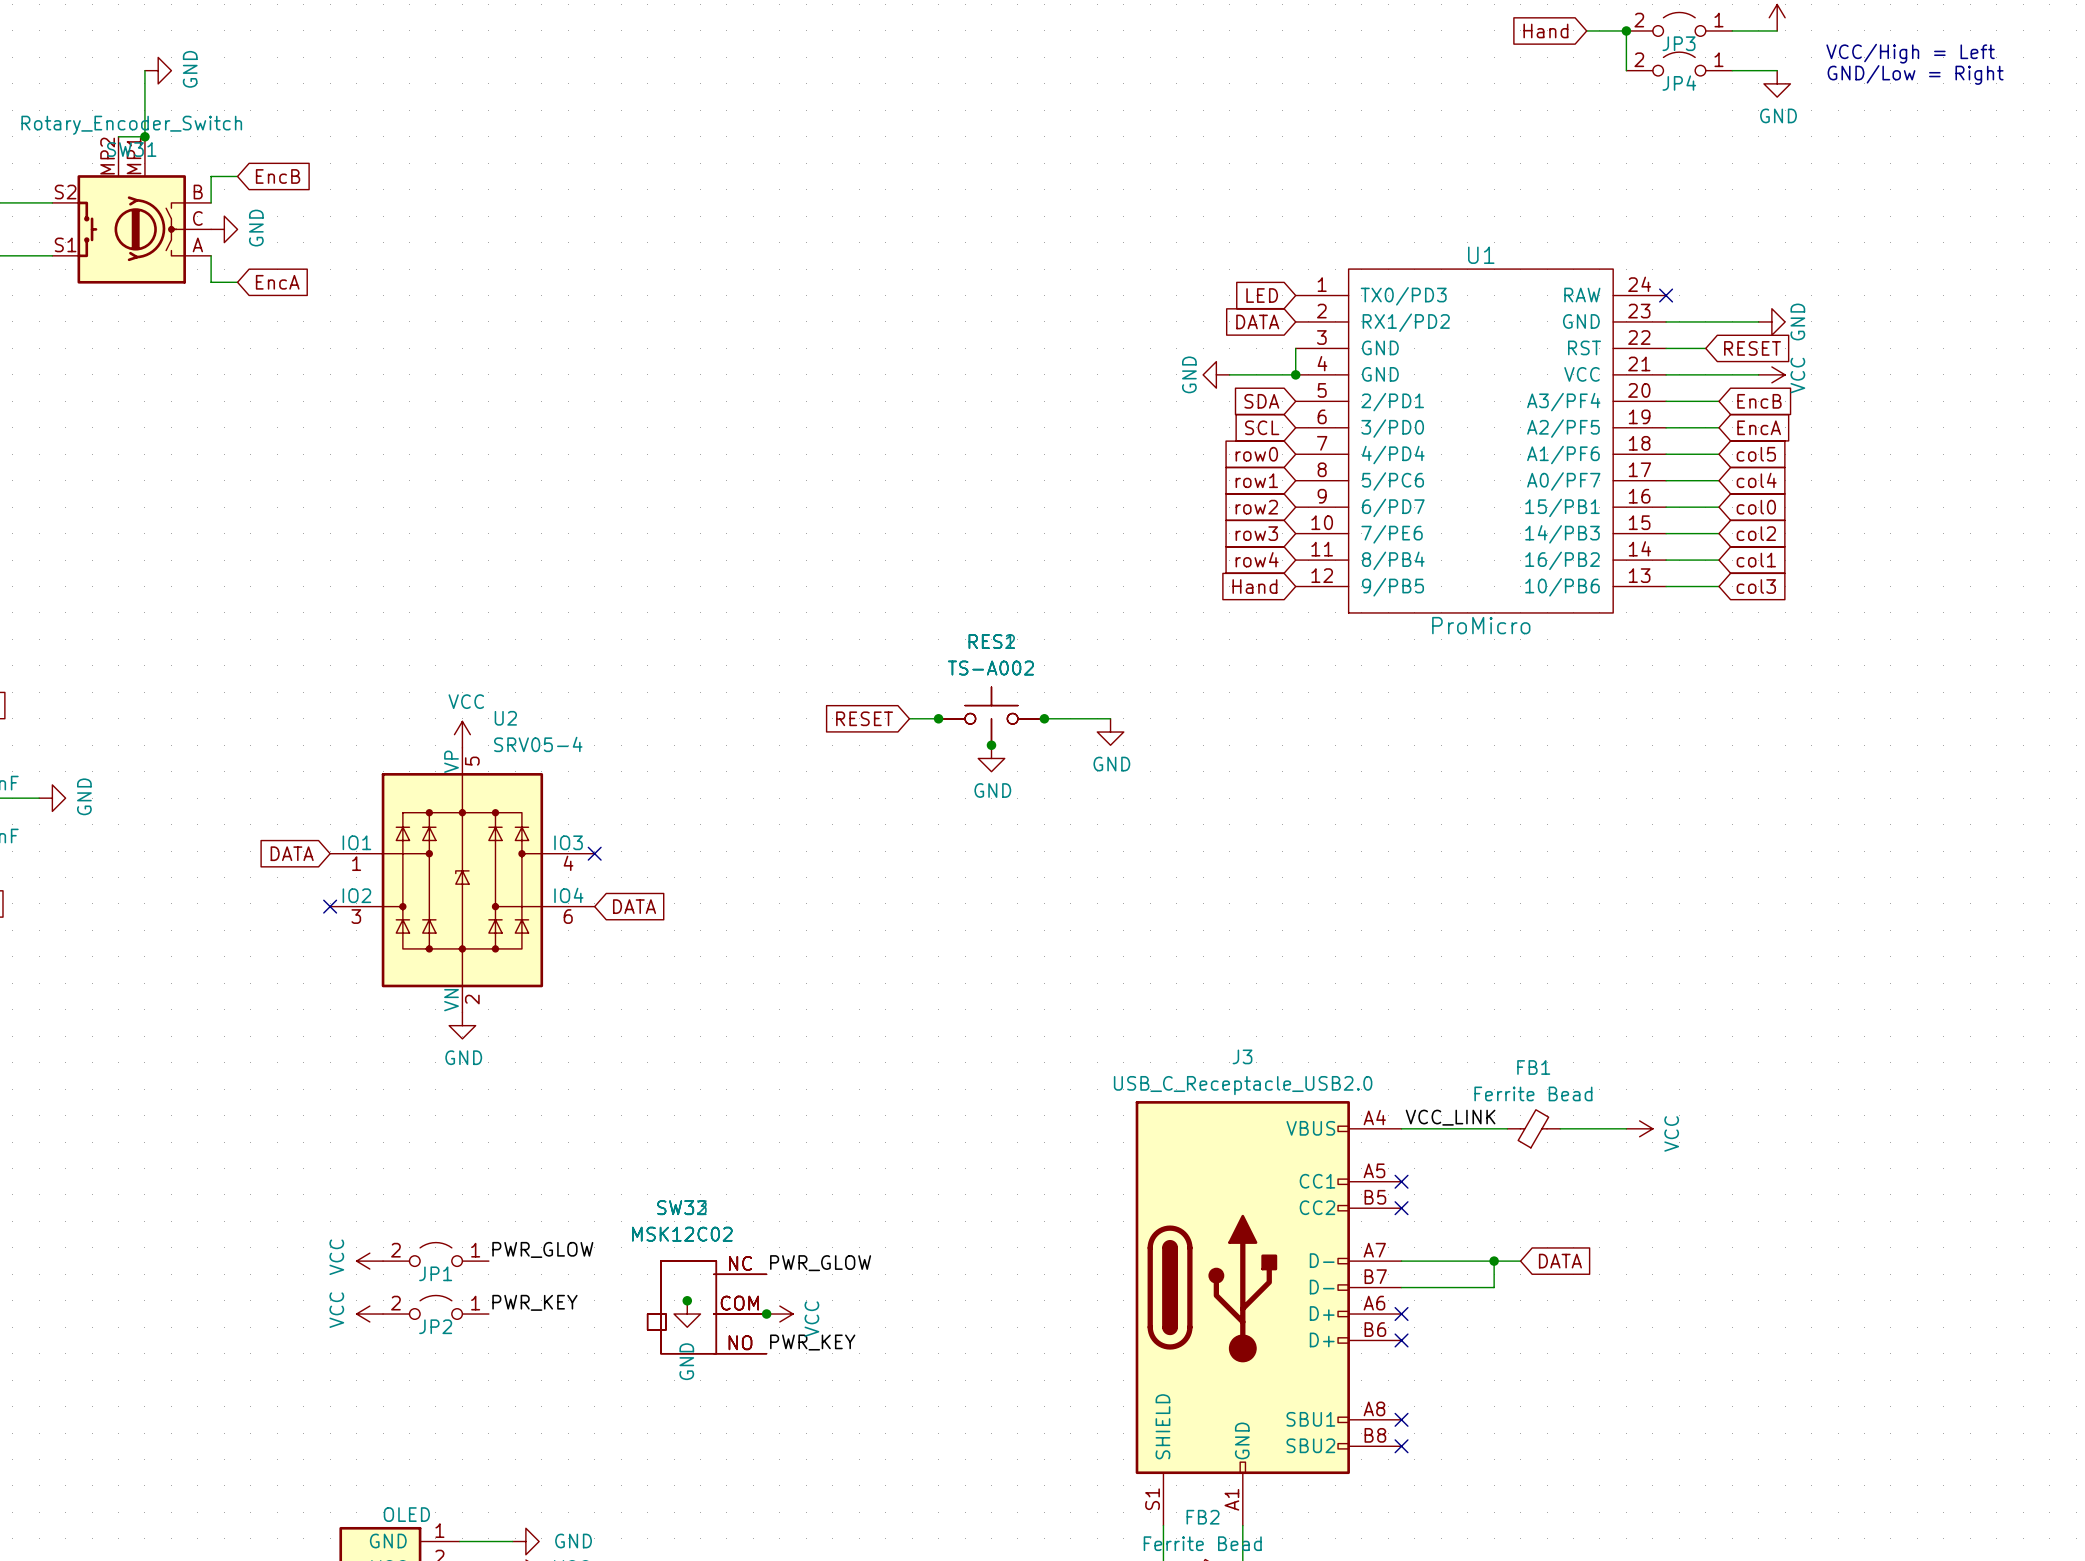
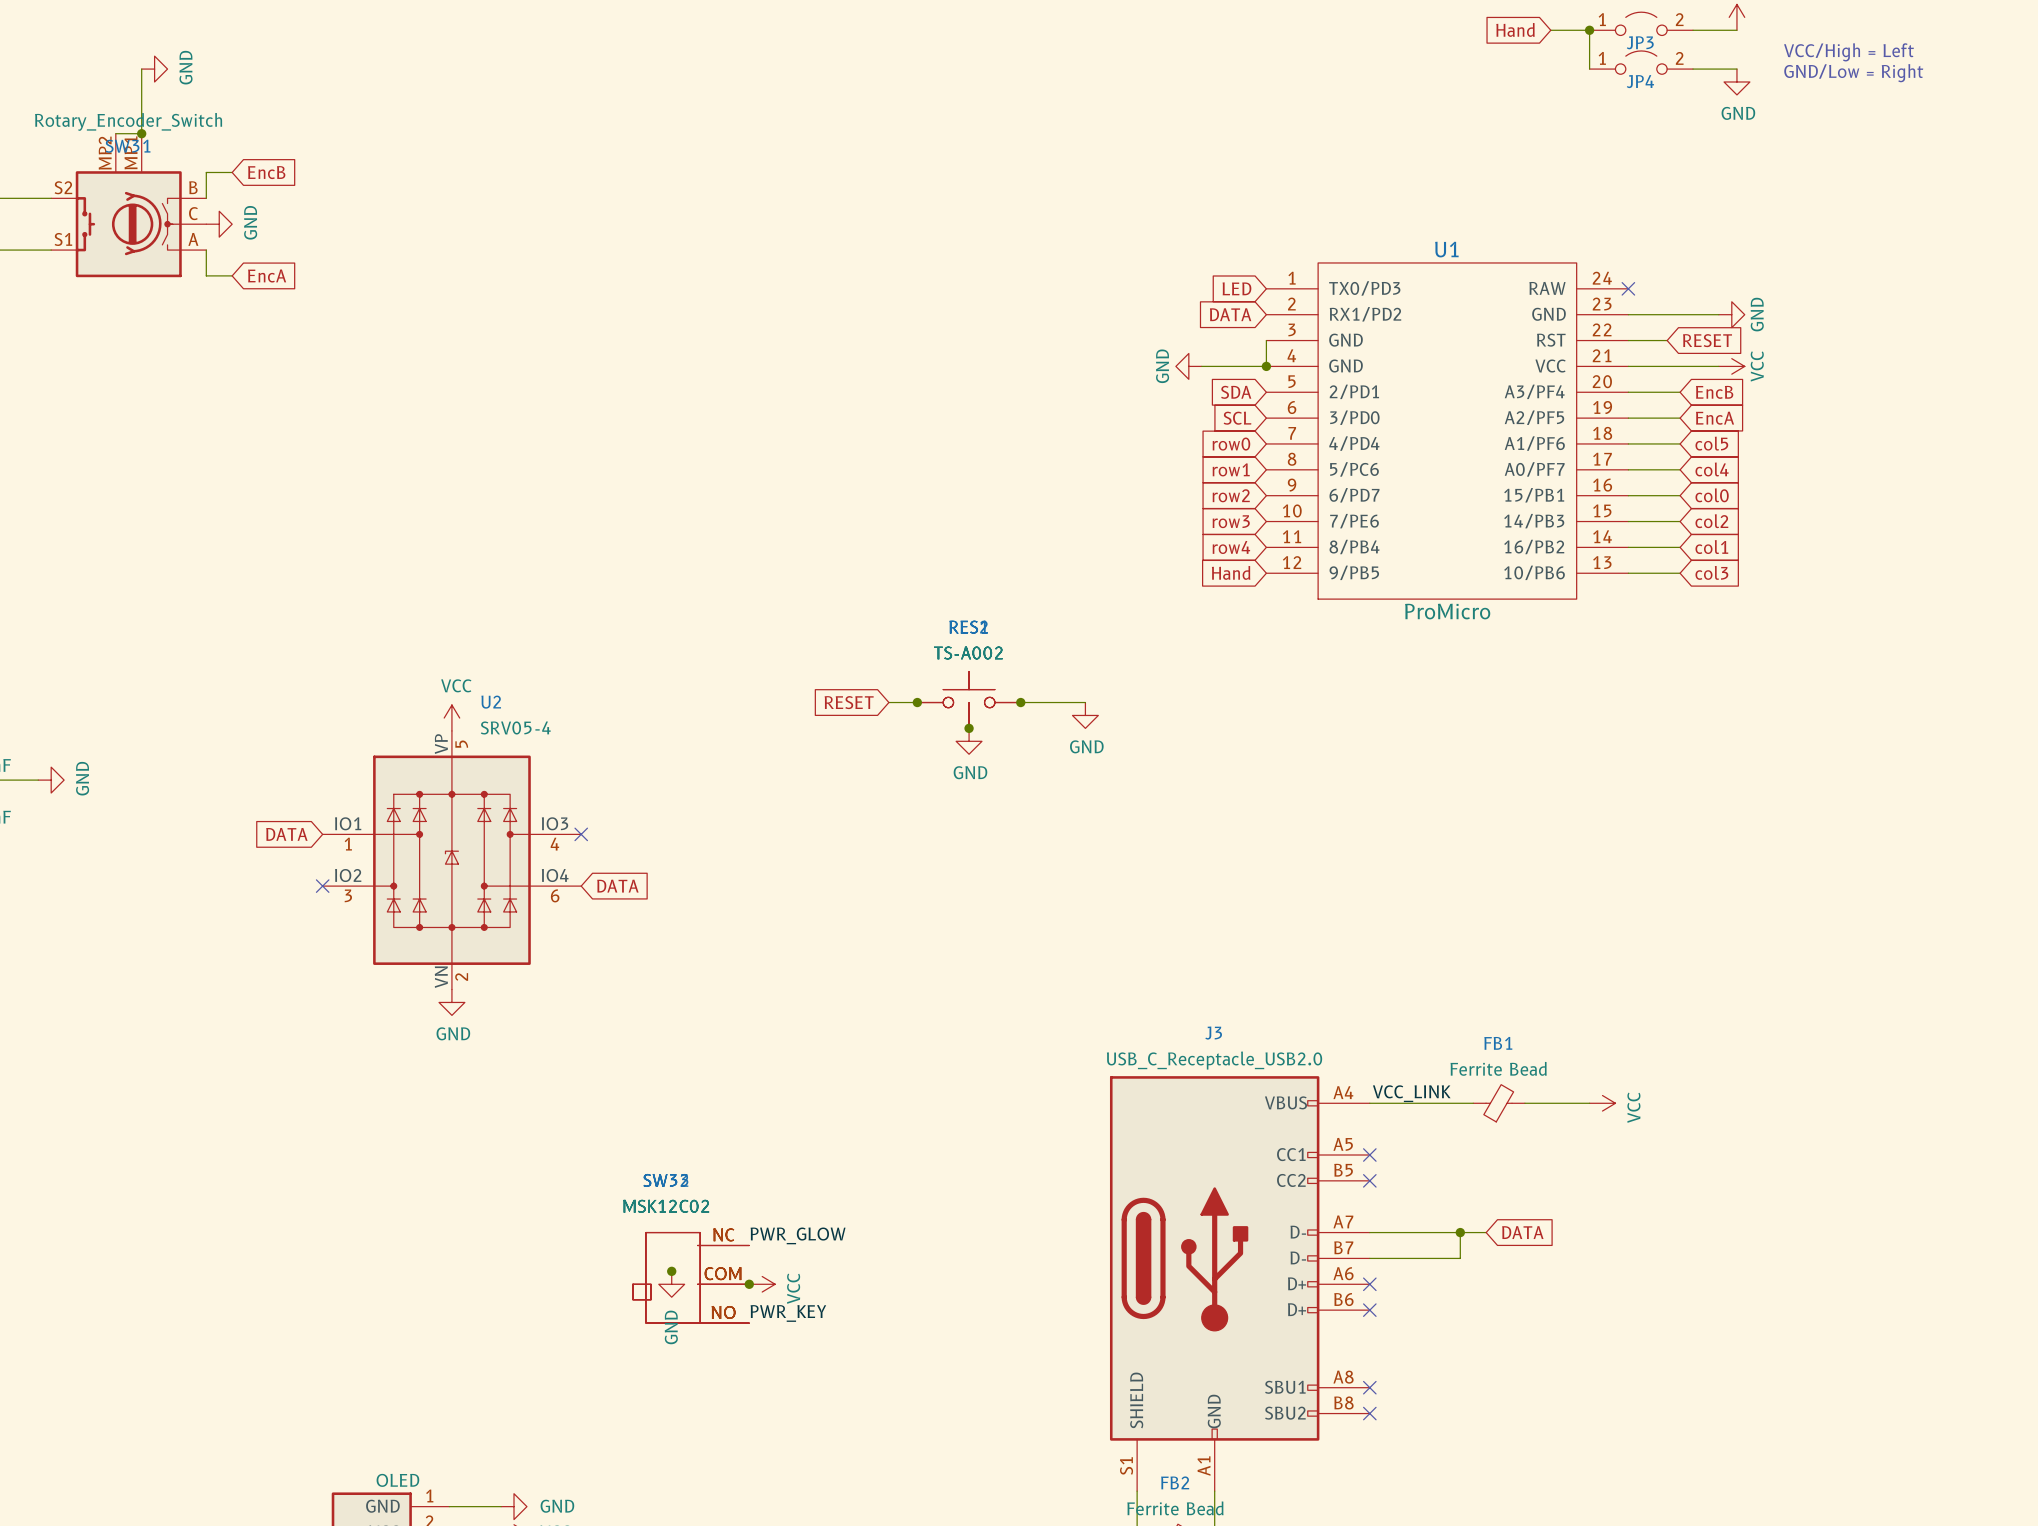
JP3 flip: as is (1679, 24) -> left-right (1641, 23)
JP4 flip: as is (1679, 64) -> left-right (1641, 62)
label: PWR_GLOW (542, 1249) -> none
JP1: (435, 1254) -> none
power symbol: VCC (369, 1261) -> none
label: PWR_KEY (534, 1302) -> none
JP2: (435, 1307) -> none
power symbol: VCC (369, 1314) -> none

